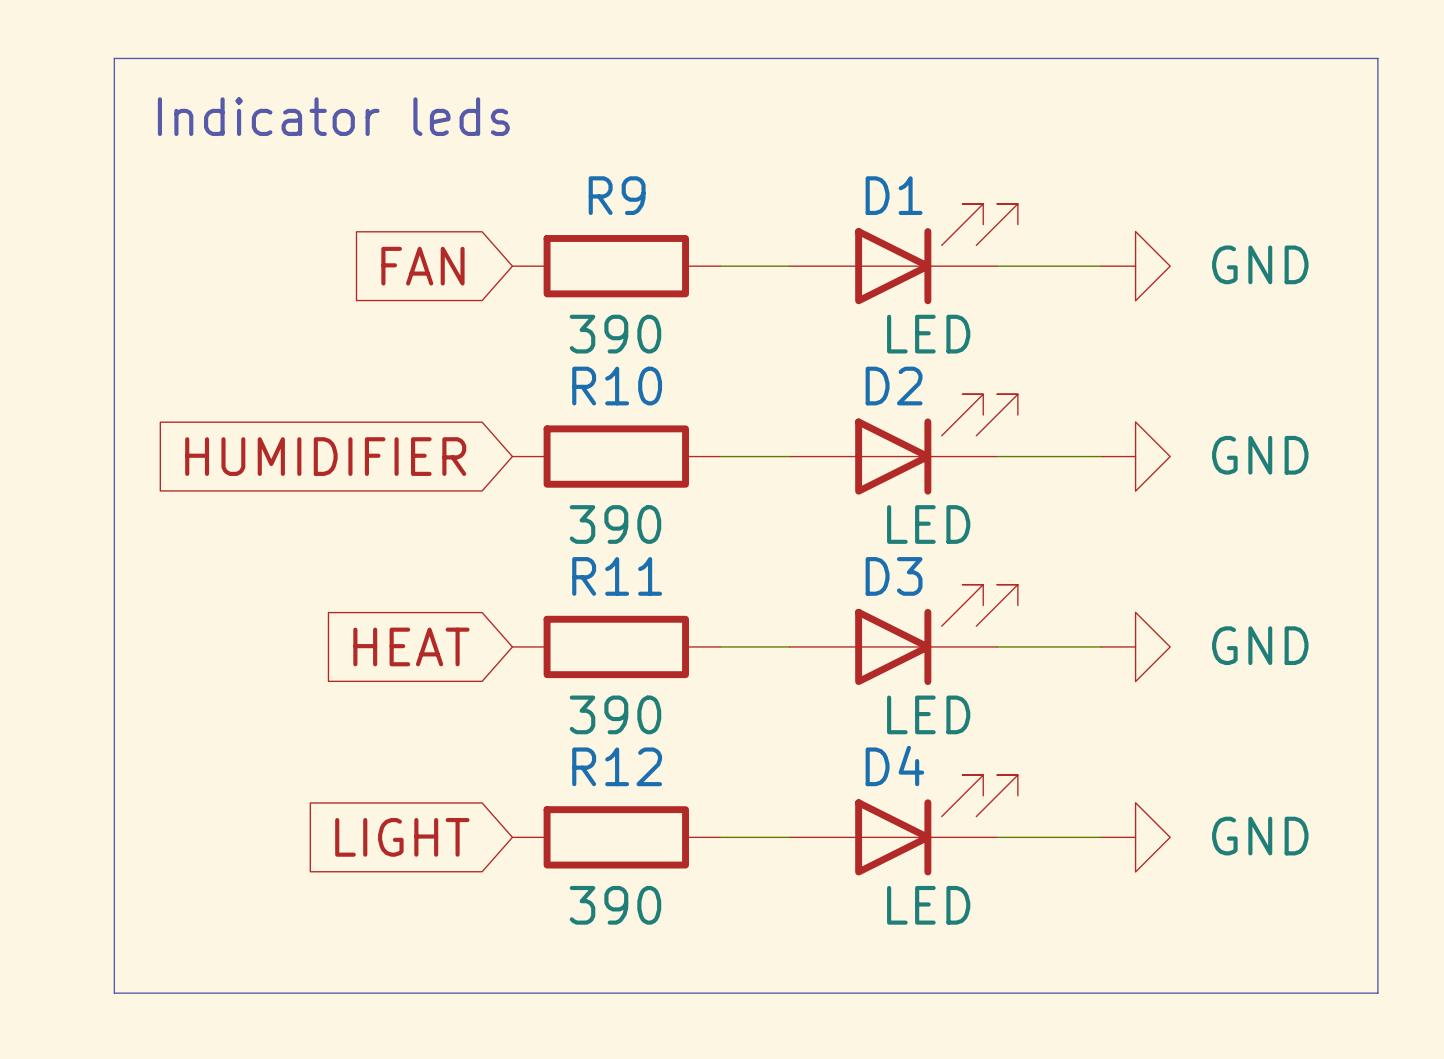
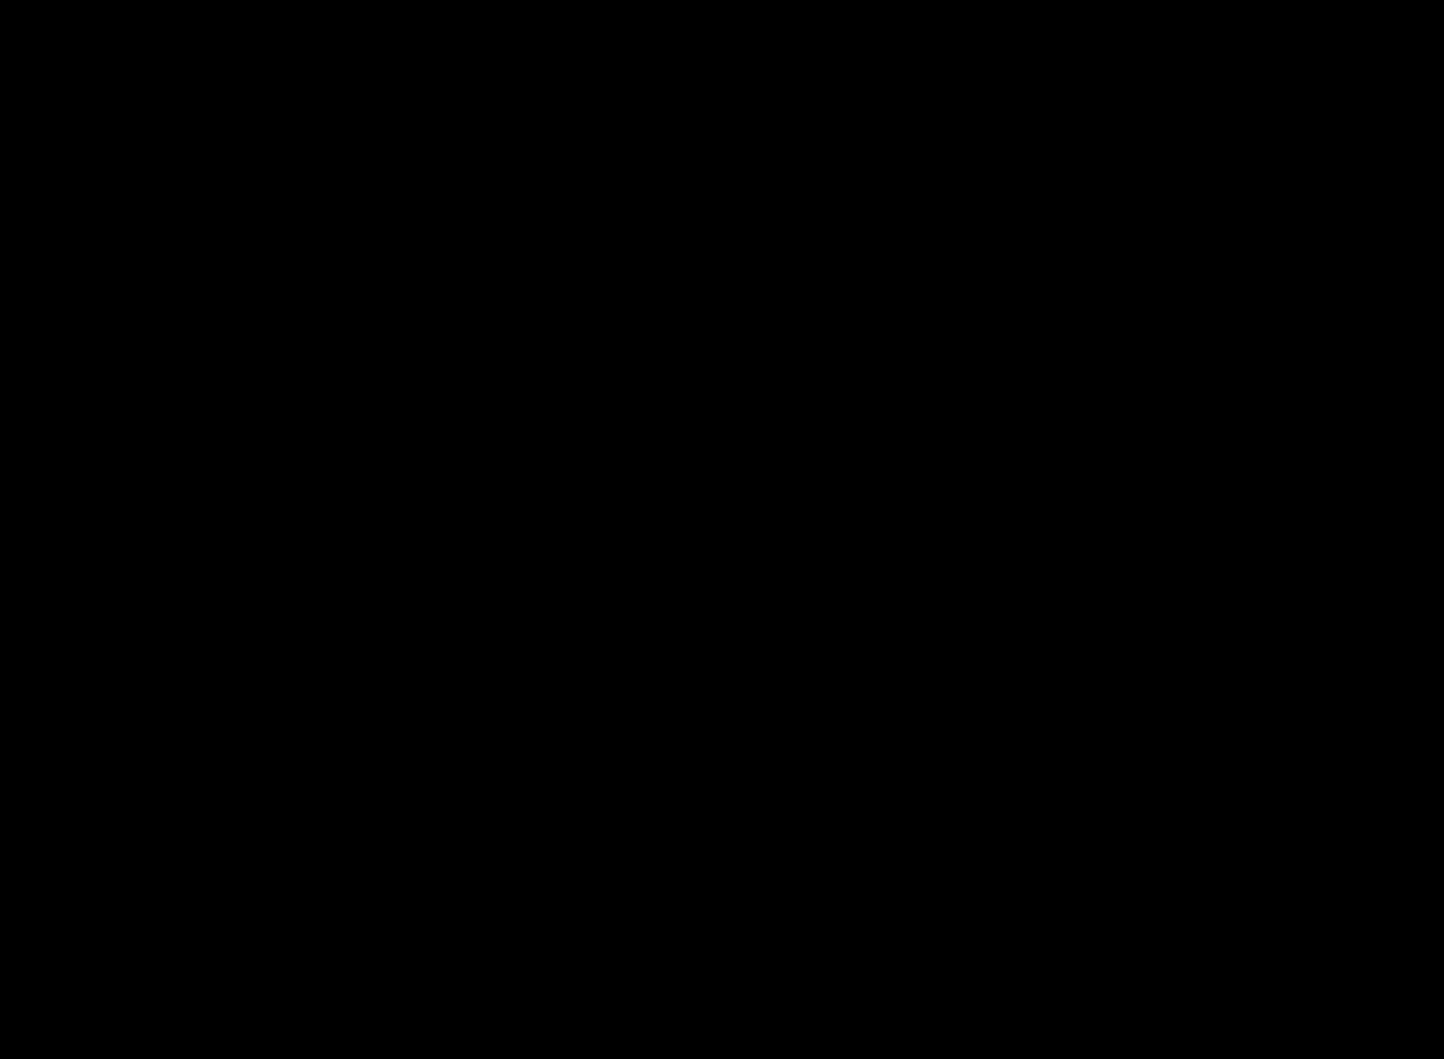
line: (114, 58) (114, 993) (1377, 993) (1377, 58) (114, 58) -> none
text: Indicator leds (333, 116) -> none
D1: LED (903, 254) -> none
global label: FAN (422, 266) -> none
R9: 390 (616, 266) -> none
wire: (720, 266) (789, 266) -> none
wire: (997, 266) (1100, 266) -> none
power symbol: GND (1135, 266) -> none
D2: LED (903, 444) -> none
global label: HUMIDIFIER (325, 456) -> none
R10: 390 (616, 456) -> none
wire: (720, 456) (789, 456) -> none
wire: (997, 456) (1100, 456) -> none
power symbol: GND (1135, 456) -> none
D3: LED (903, 634) -> none
global label: HEAT (411, 646) -> none
R11: 390 (616, 646) -> none
wire: (720, 646) (789, 646) -> none
wire: (997, 646) (1100, 646) -> none
power symbol: GND (1135, 646) -> none
D4: LED (903, 825) -> none
global label: LIGHT (402, 837) -> none
R12: 390 (616, 837) -> none
wire: (720, 837) (789, 837) -> none
wire: (997, 837) (1100, 837) -> none
power symbol: GND (1135, 837) -> none

